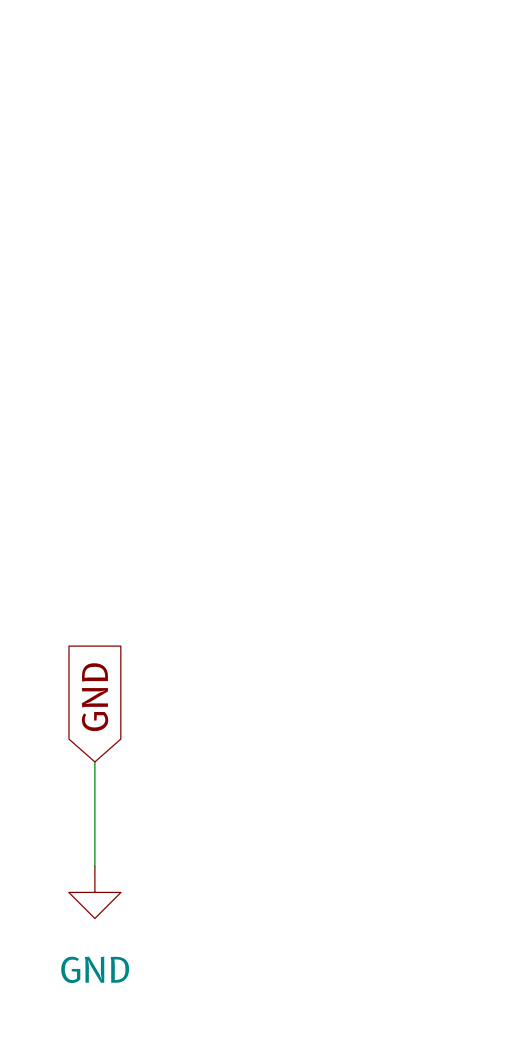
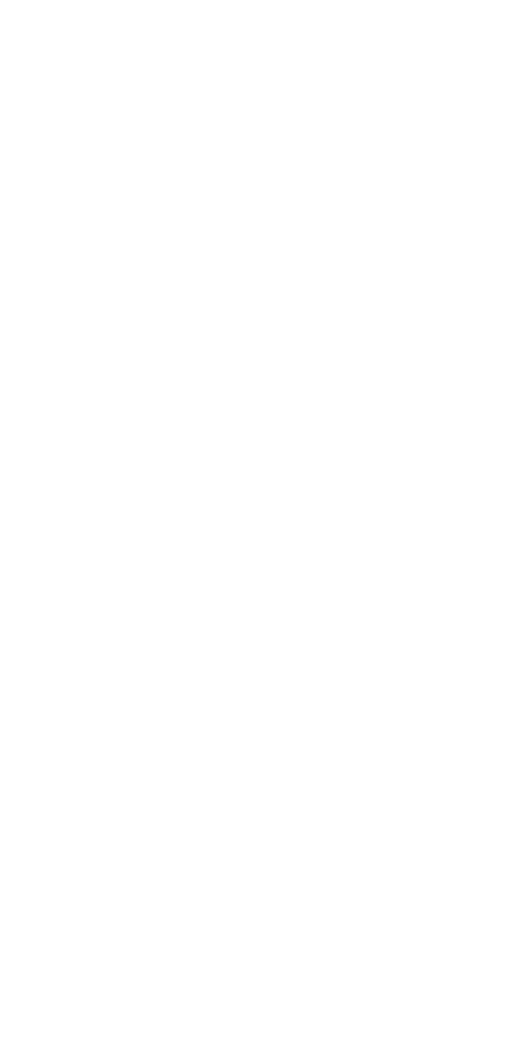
global label: GND (95, 697) -> none
wire: (94, 761) (94, 866) -> none
power symbol: GND (94, 892) -> none

